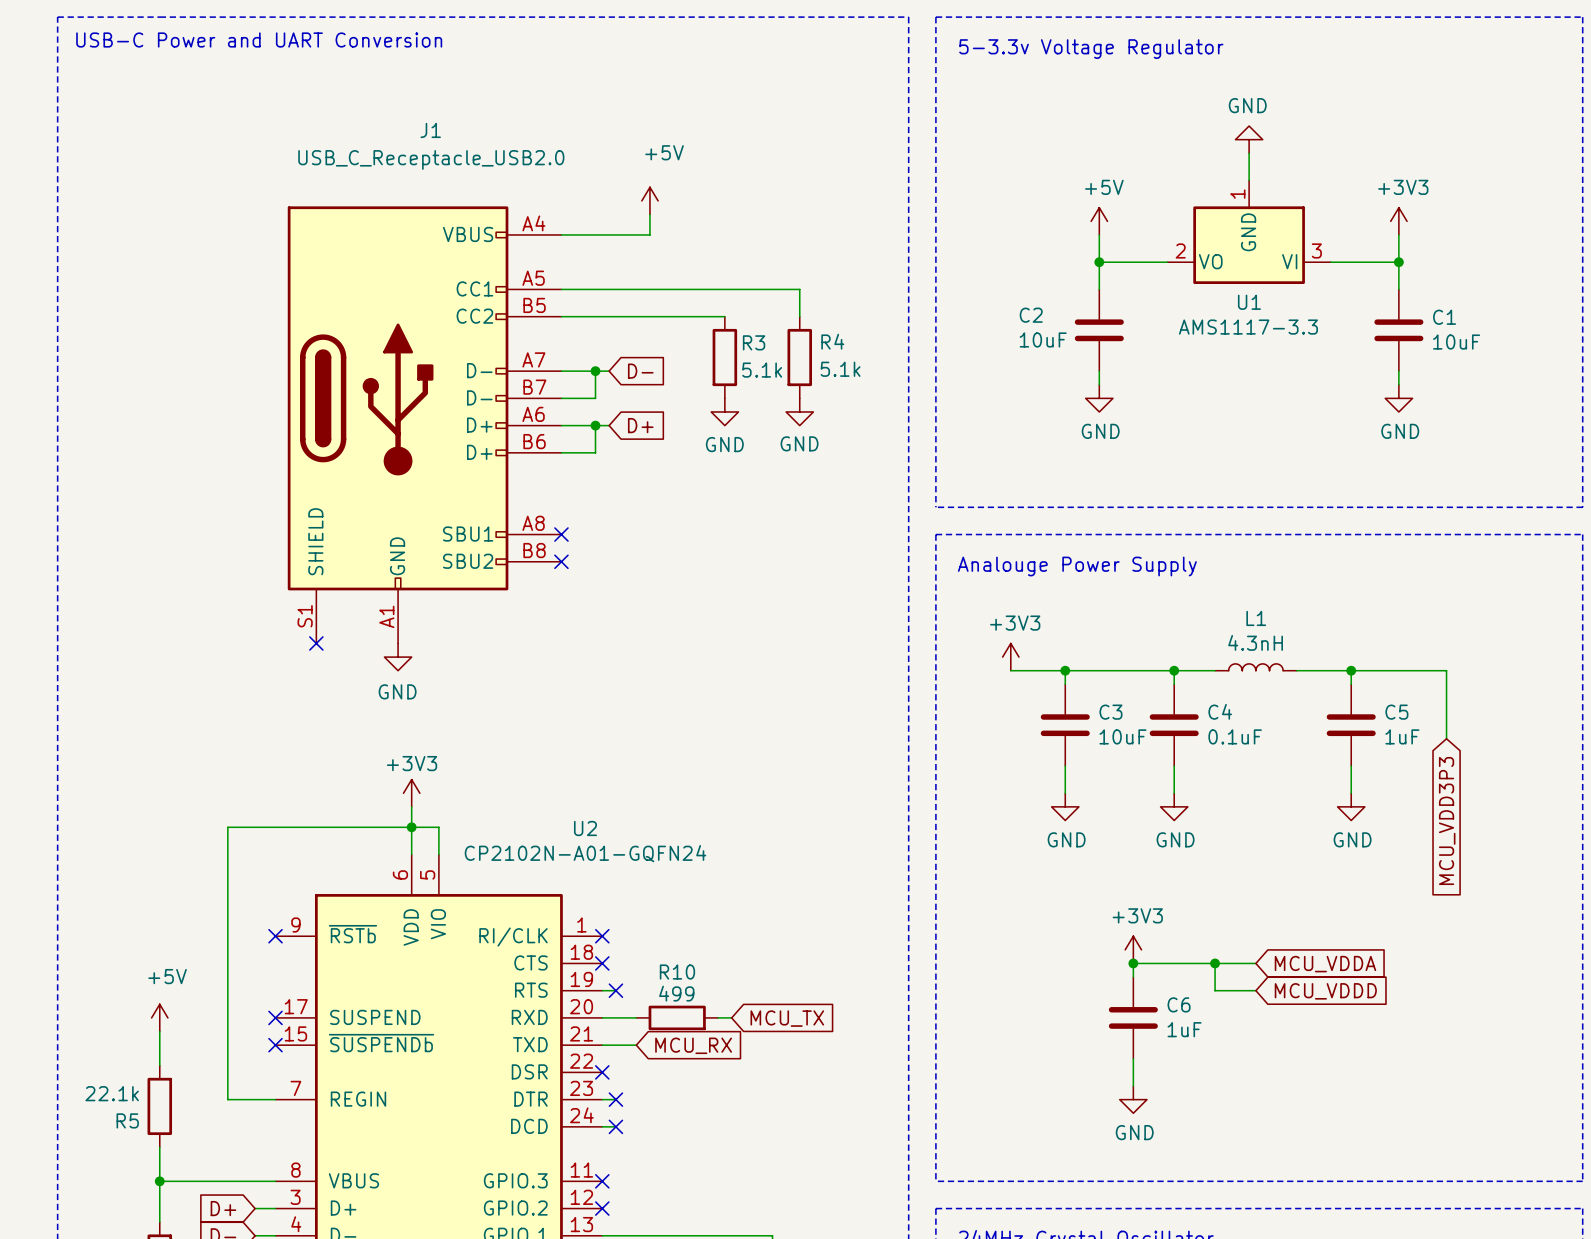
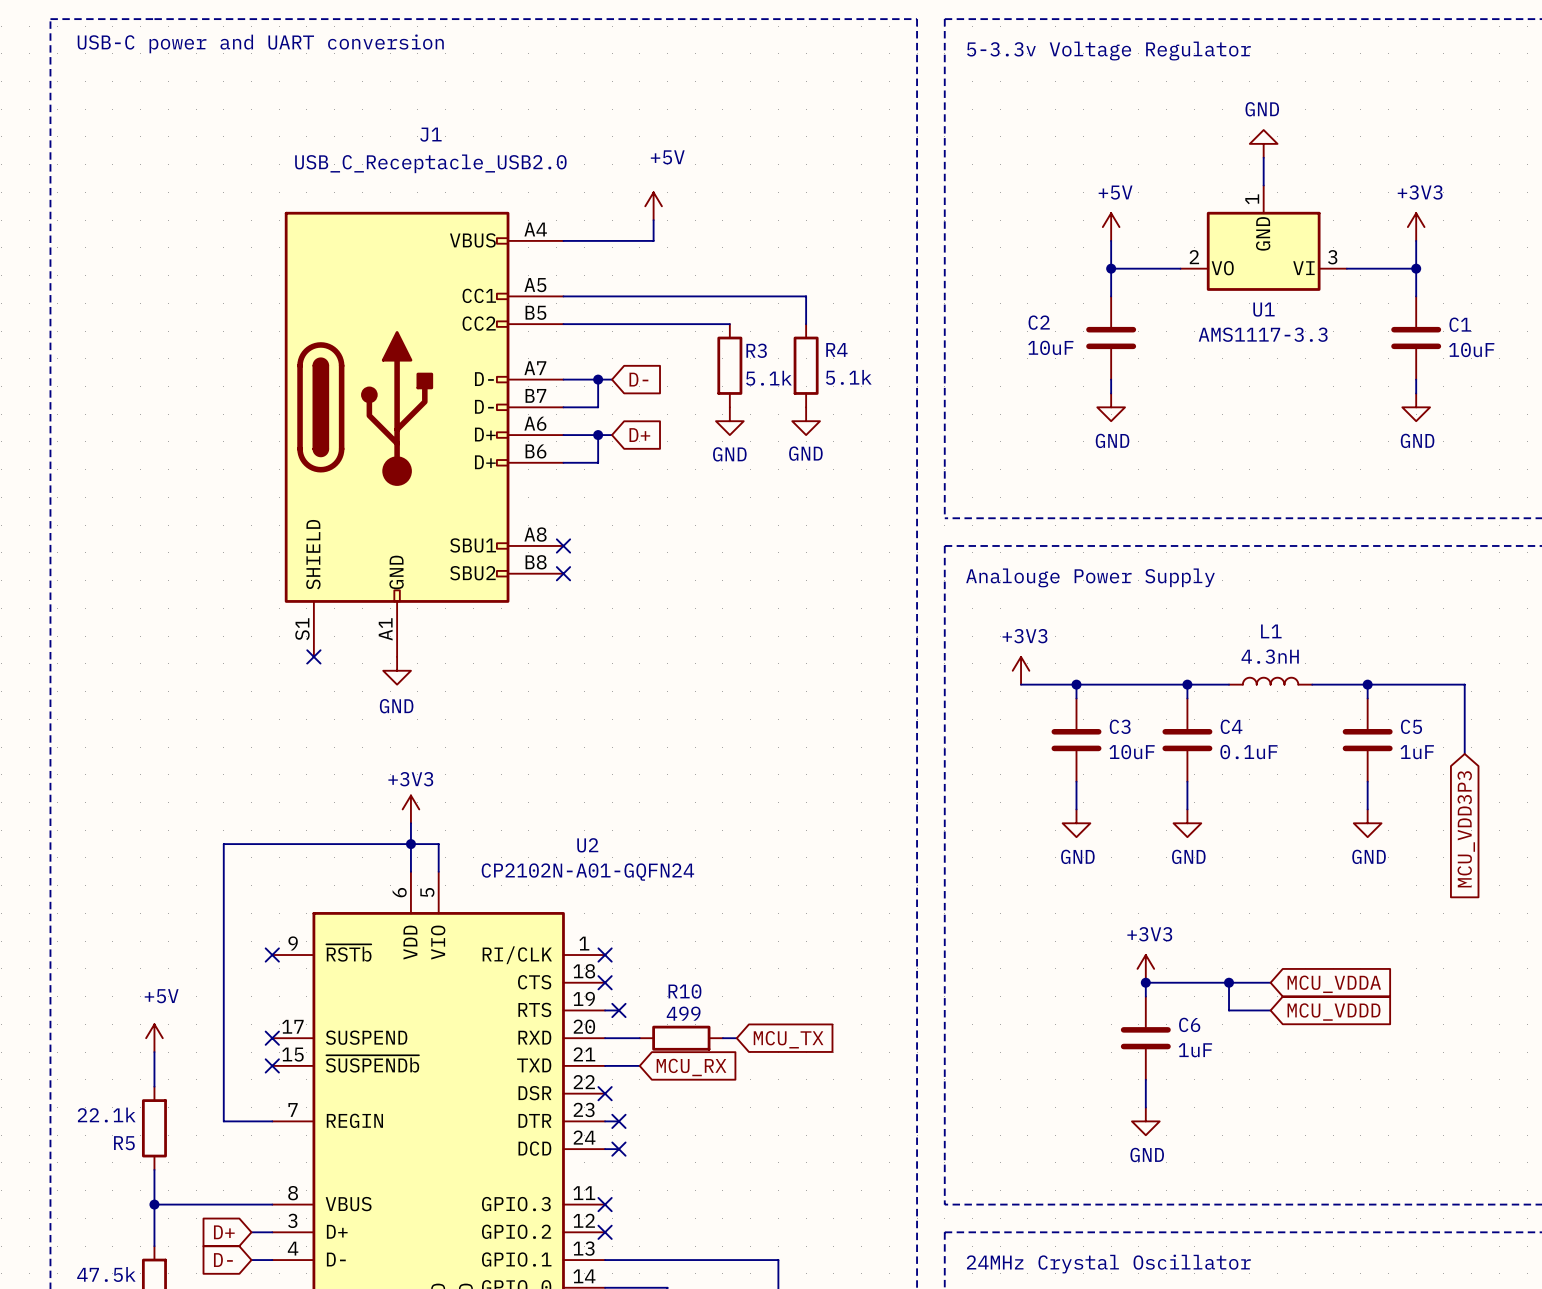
text: USB-C Power and UART Conversion (259, 39) -> USB-C power and UART conversion (260, 43)

